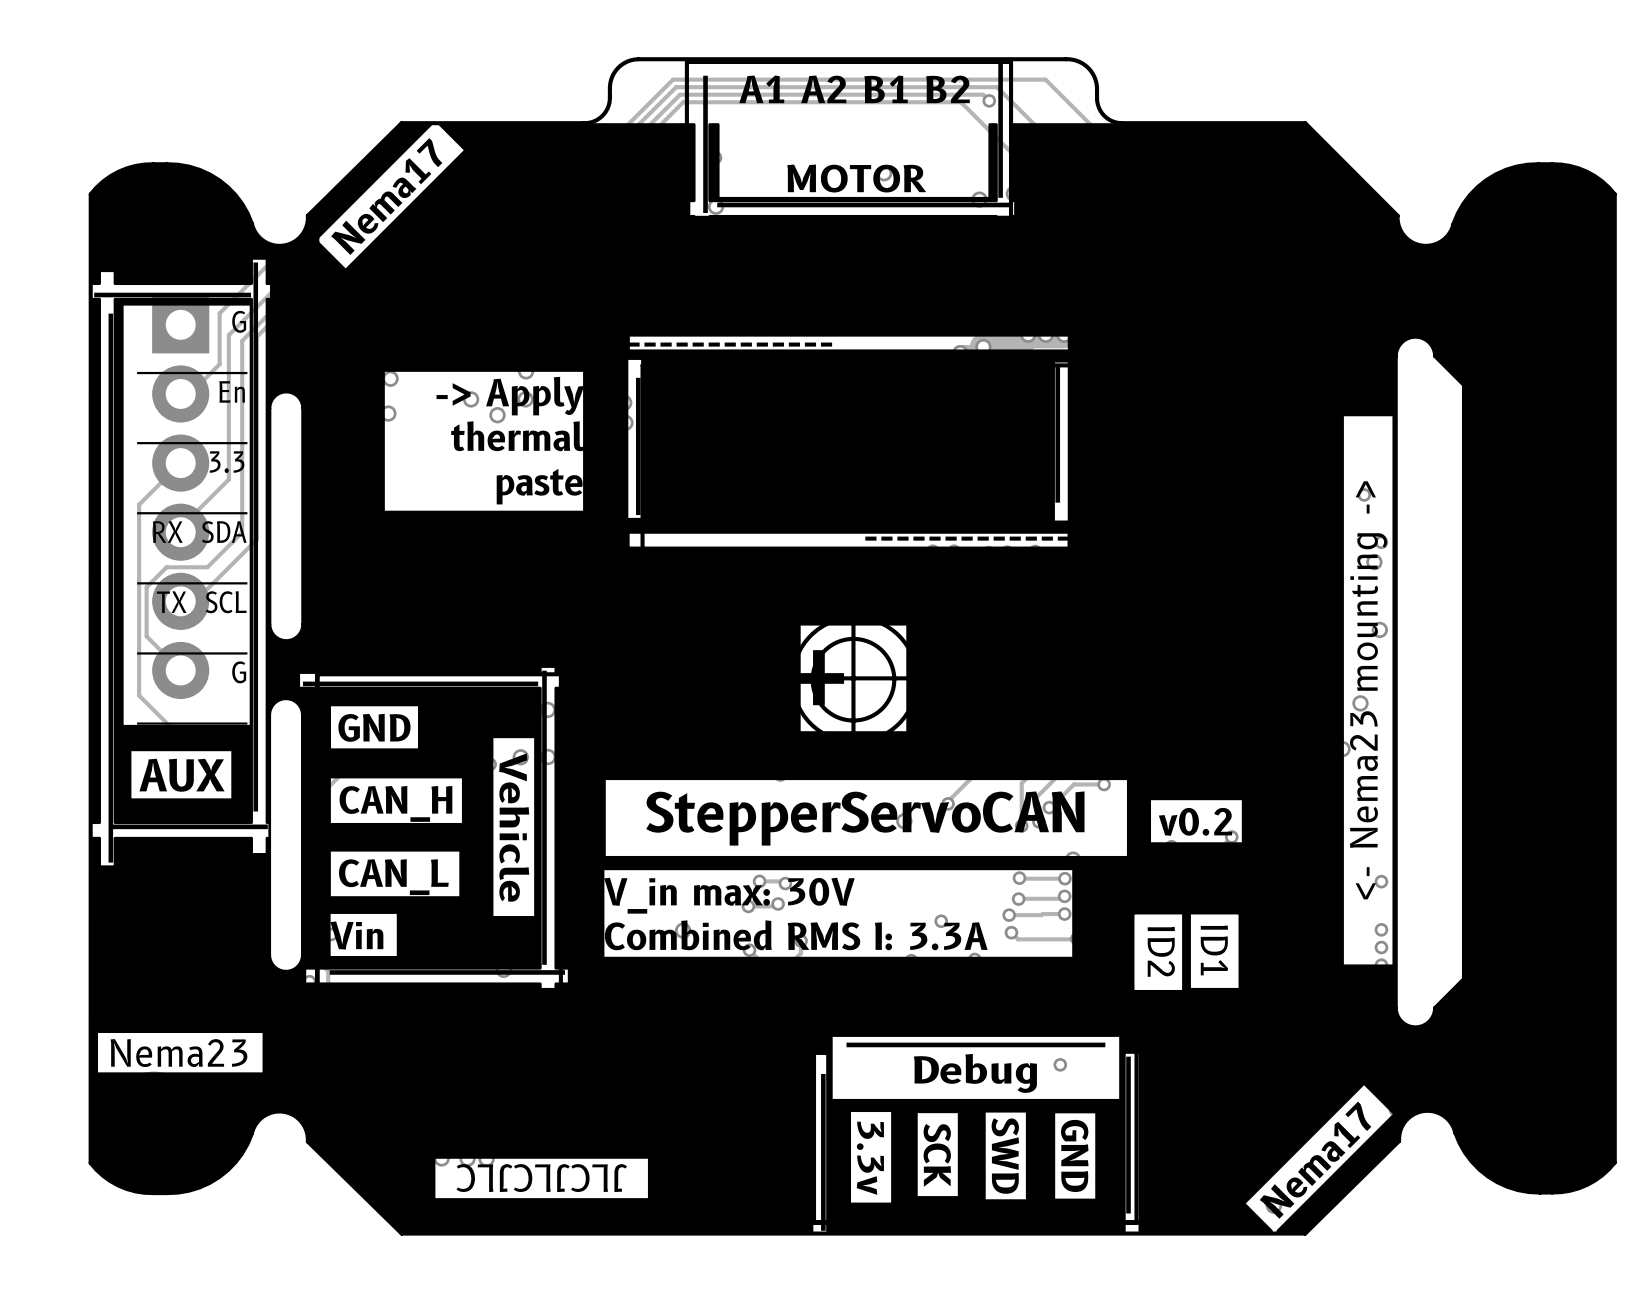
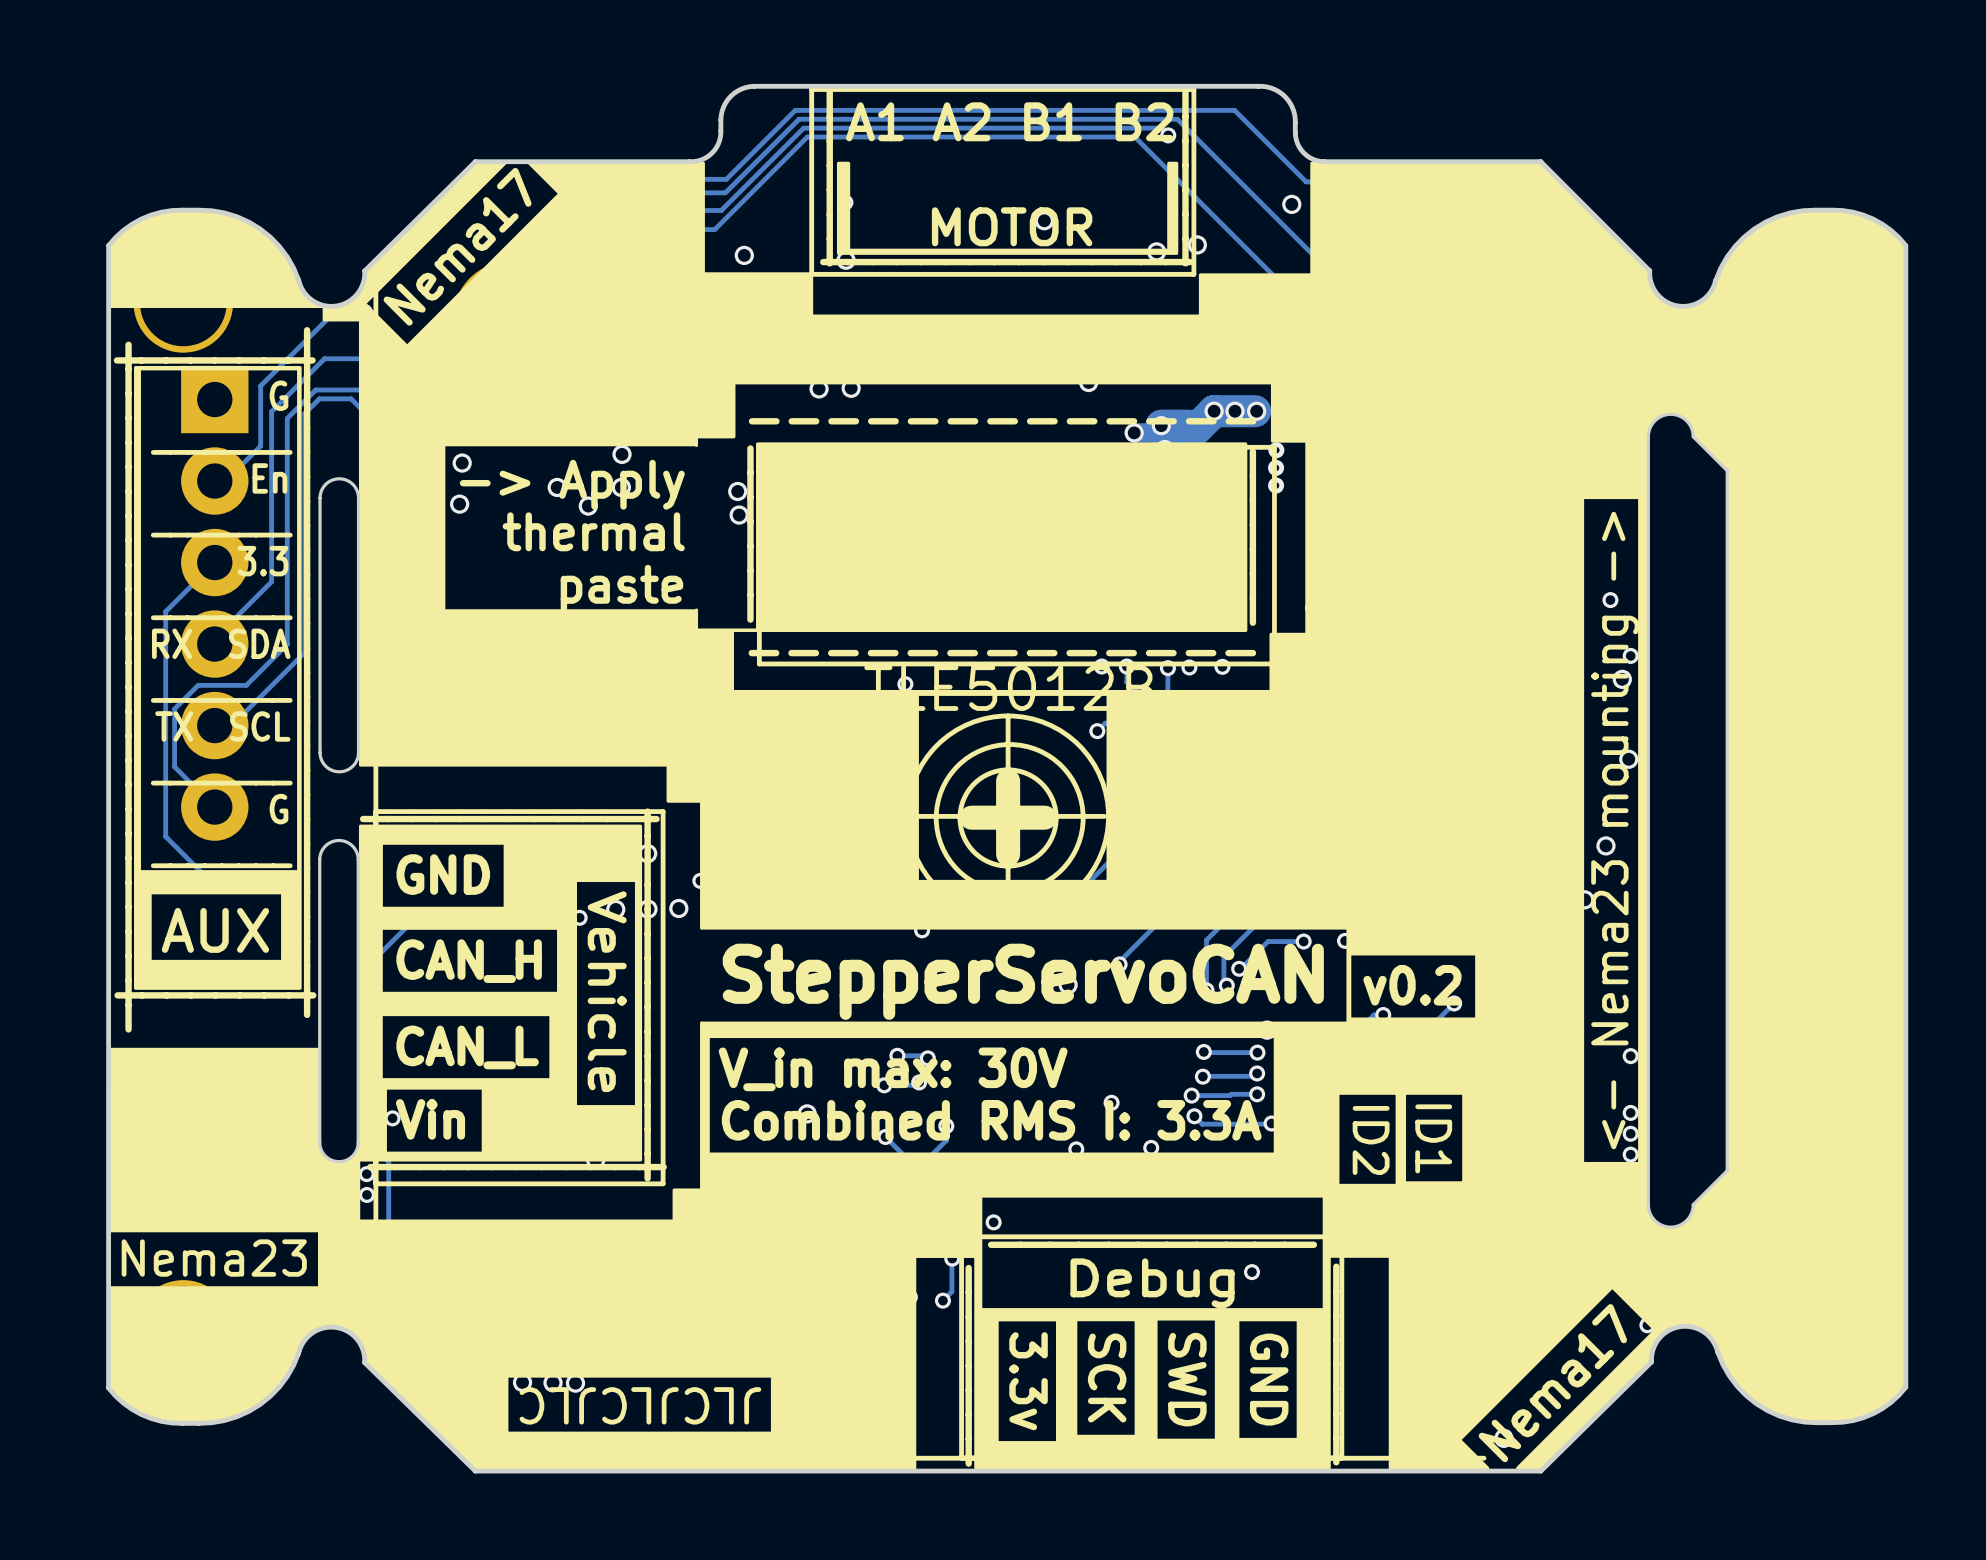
drawing shape: [90, 123, 1615, 1234] -> [108, 161, 1906, 1471]
drawing: [90, 297, 101, 825] -> none
drawing shape: [113, 297, 253, 825] -> [133, 365, 302, 990]

